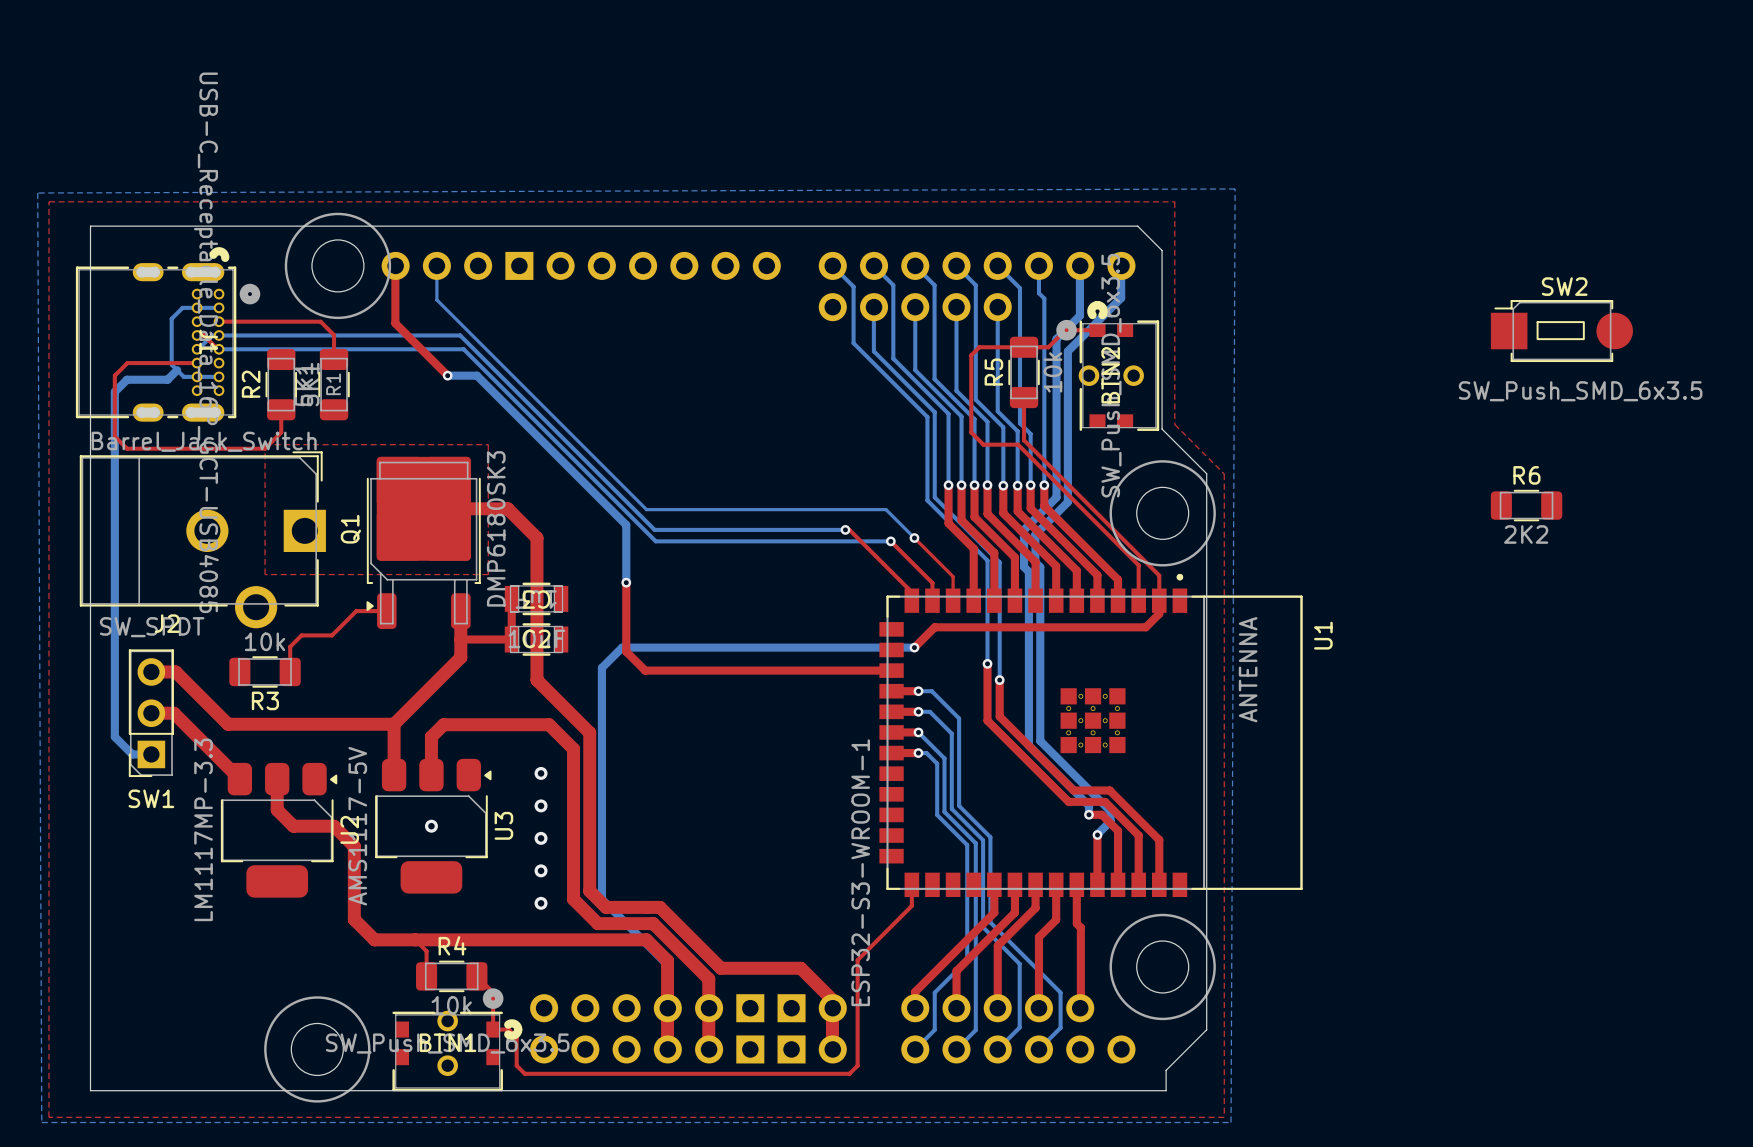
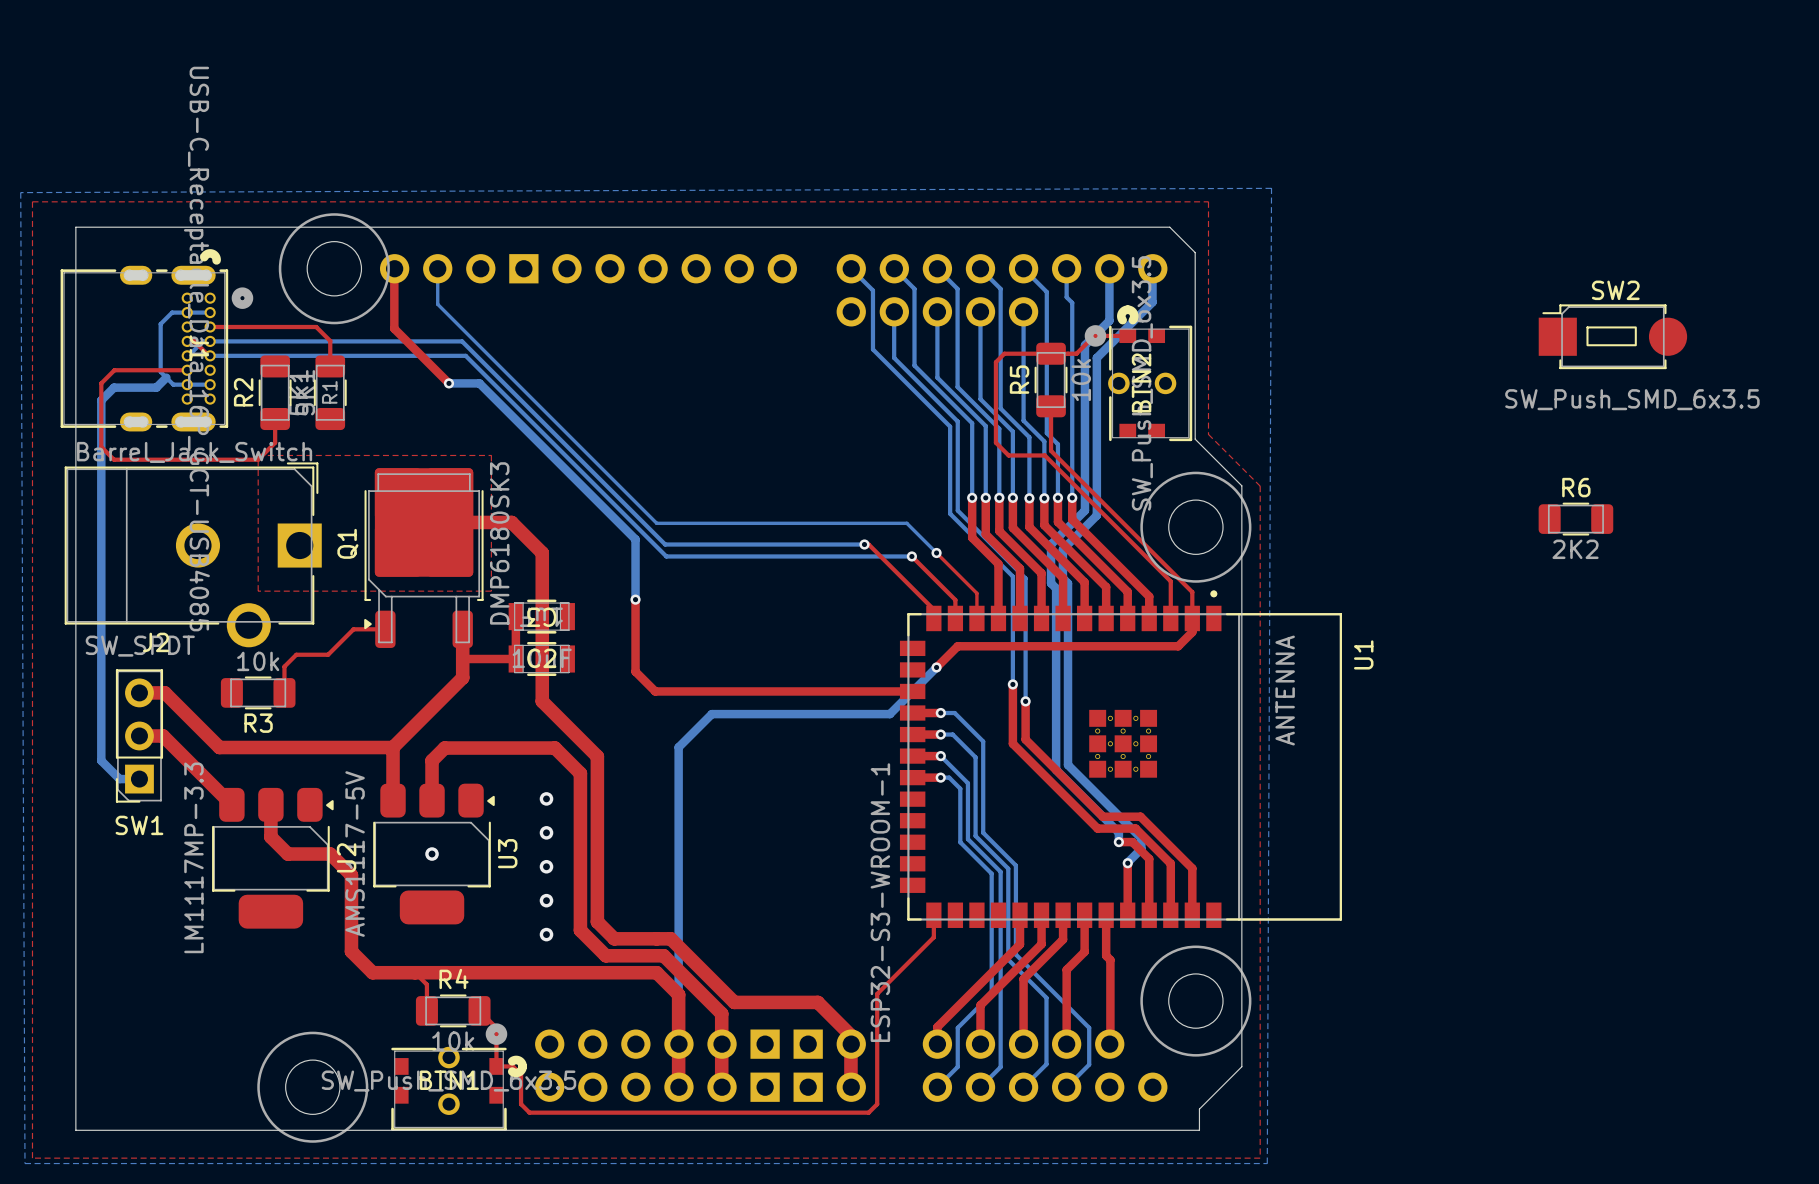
bottom track: (914, 647) (622, 647) (601, 667) (601, 899) (667, 964) -> (936, 667) (889, 714) (711, 714) (678, 747) (678, 998)

